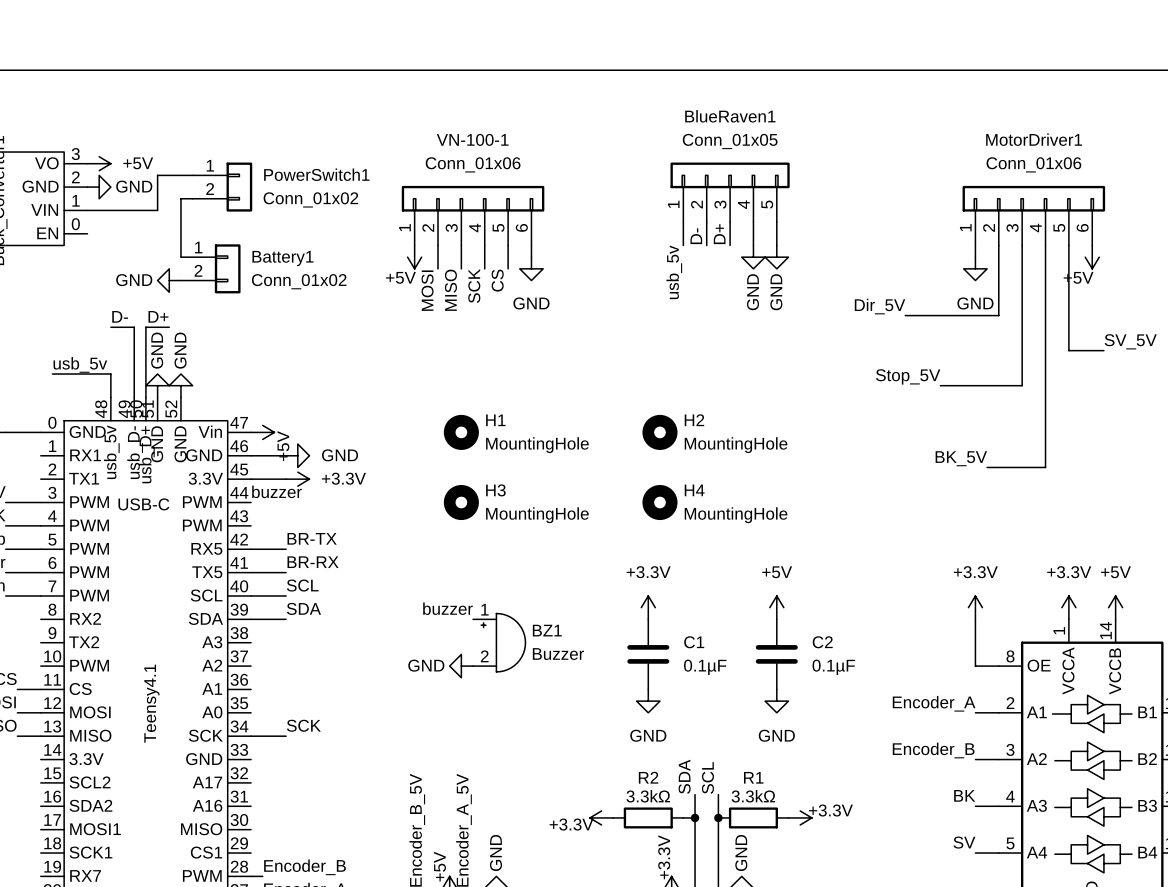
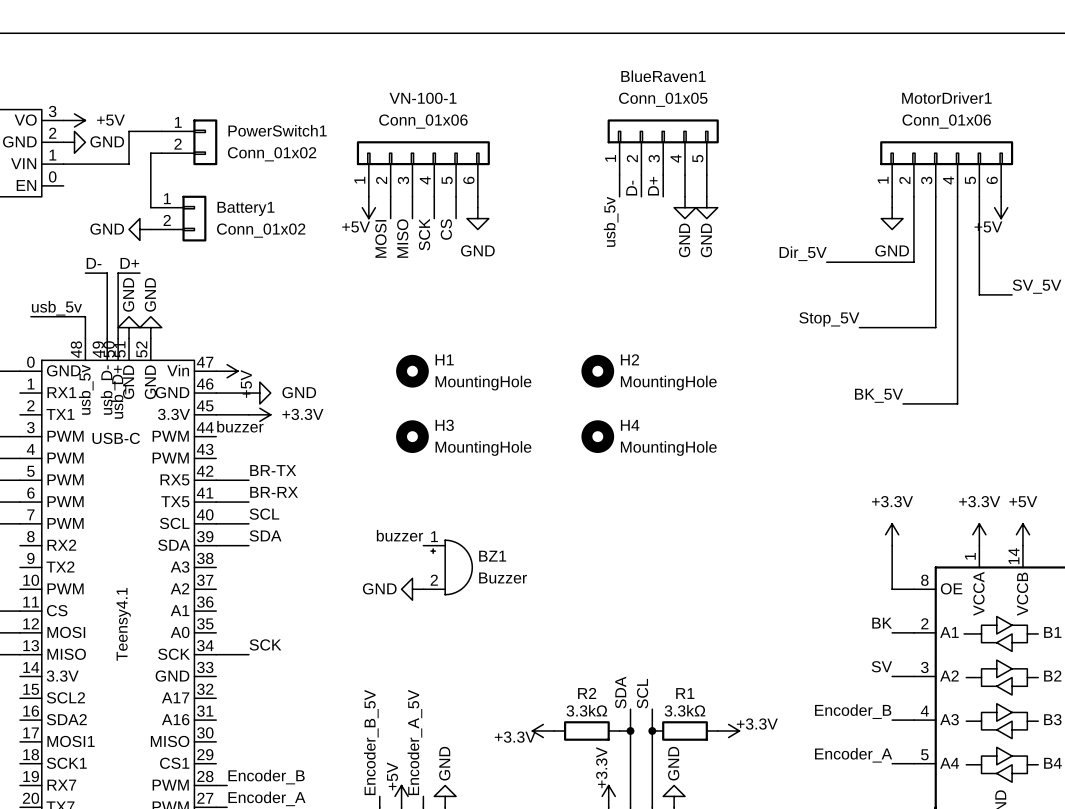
power symbol: +3.3V (648, 607) -> none
power symbol: +5V (776, 607) -> none
C1: 0.1µF (648, 654) -> none
C2: 0.1µF (776, 654) -> none
power symbol: GND (648, 701) -> none
power symbol: GND (776, 701) -> none
label: Encoder_A (934, 703) -> BK (882, 623)
label: Encoder_B (933, 750) -> SV (881, 666)
label: BK (964, 795) -> Encoder_B (853, 711)
label: SV (964, 842) -> Encoder_A (853, 755)

